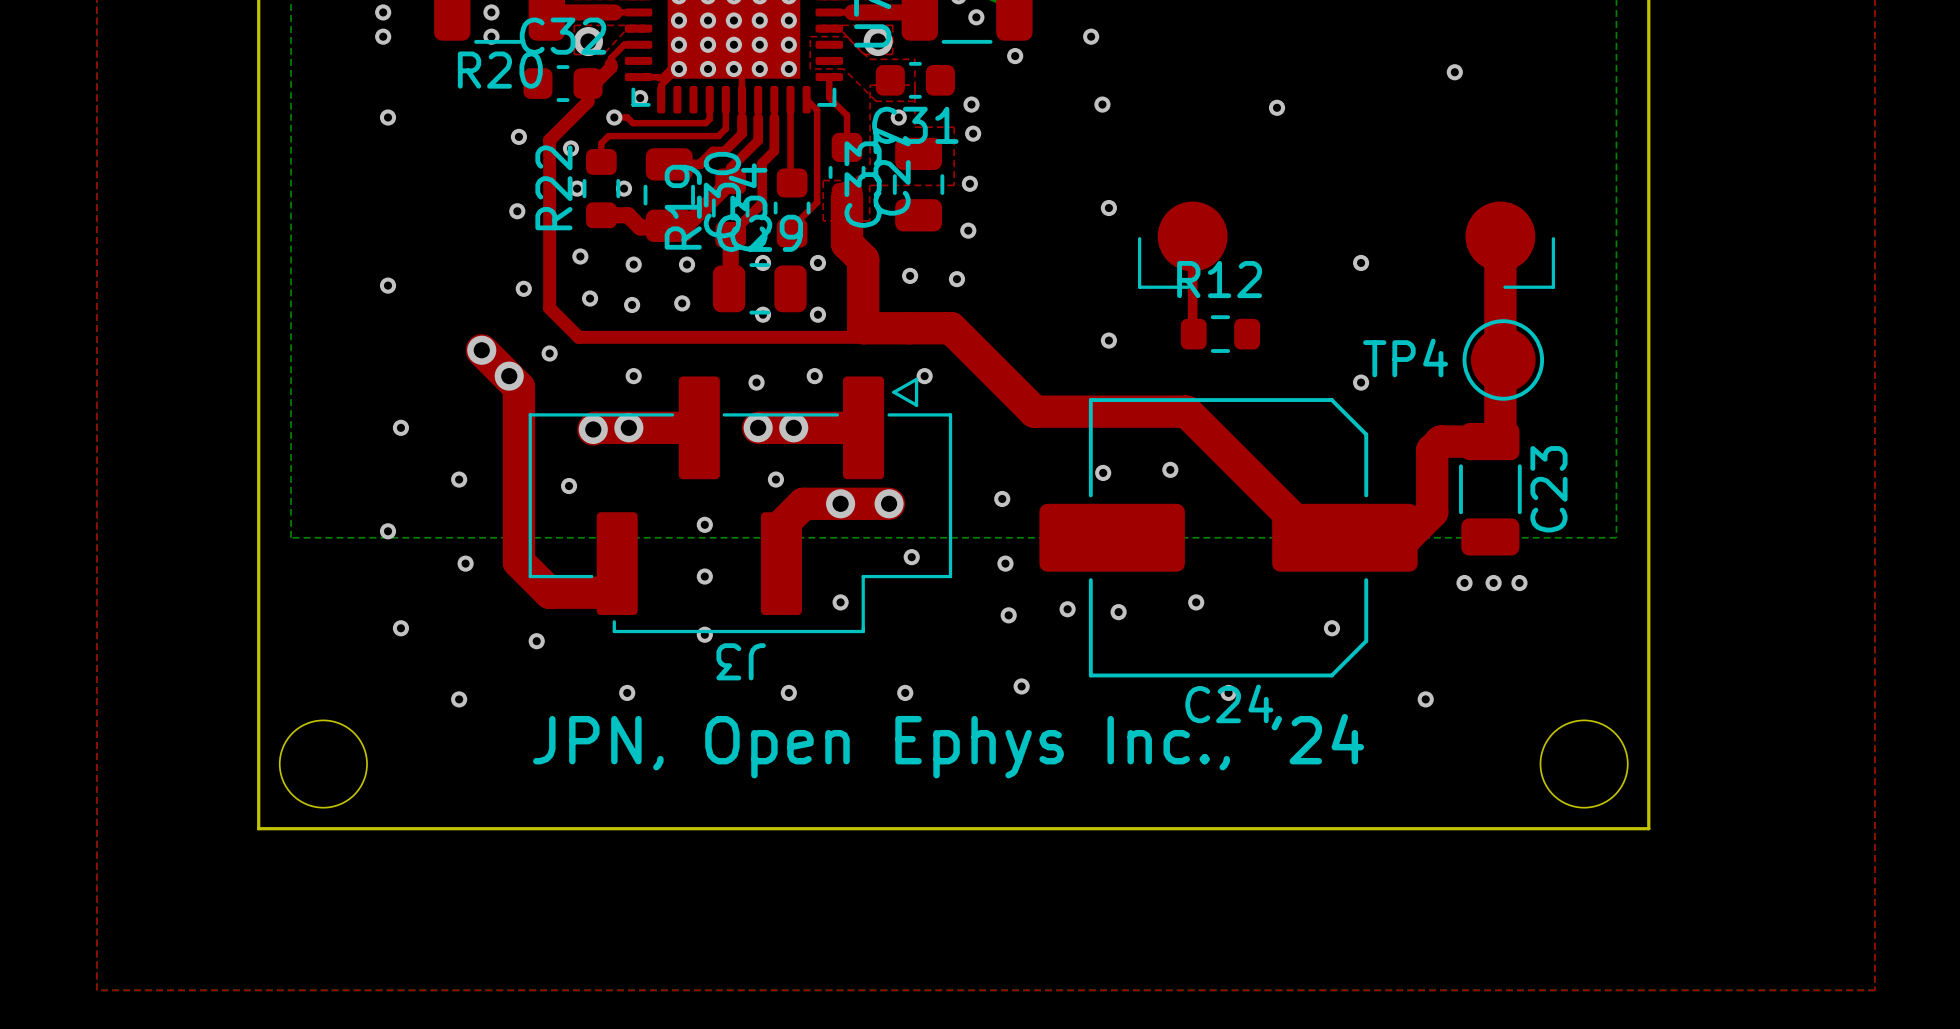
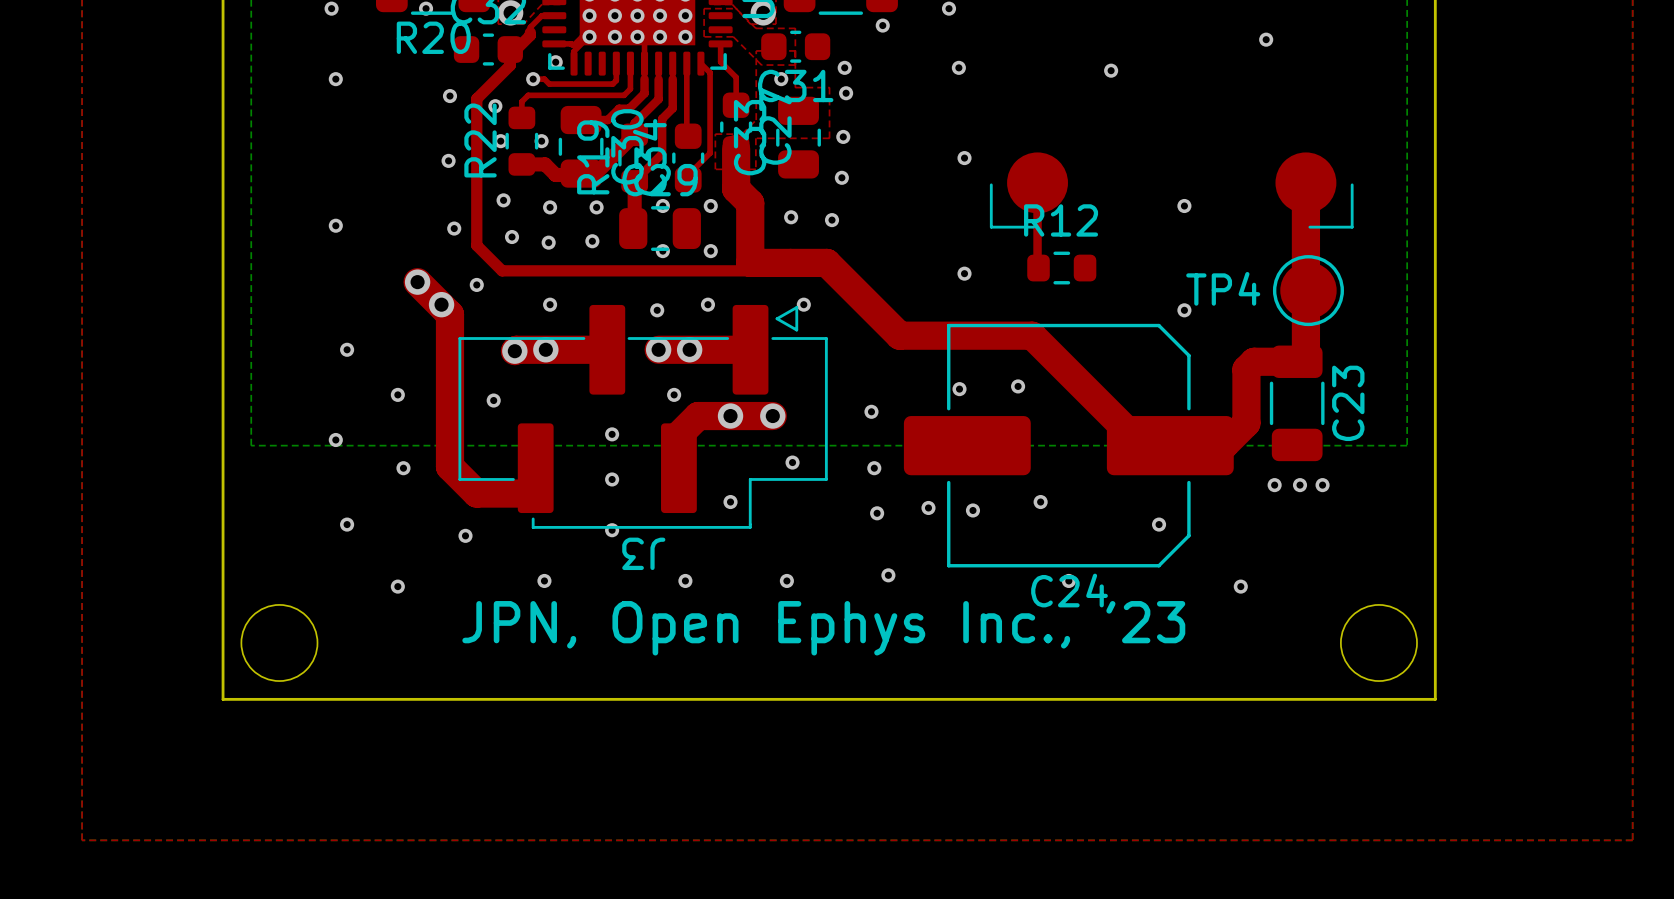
text: JPN, Open Ephys Inc., '24 (948, 746) -> JPN, Open Ephys Inc., '23 (823, 628)

